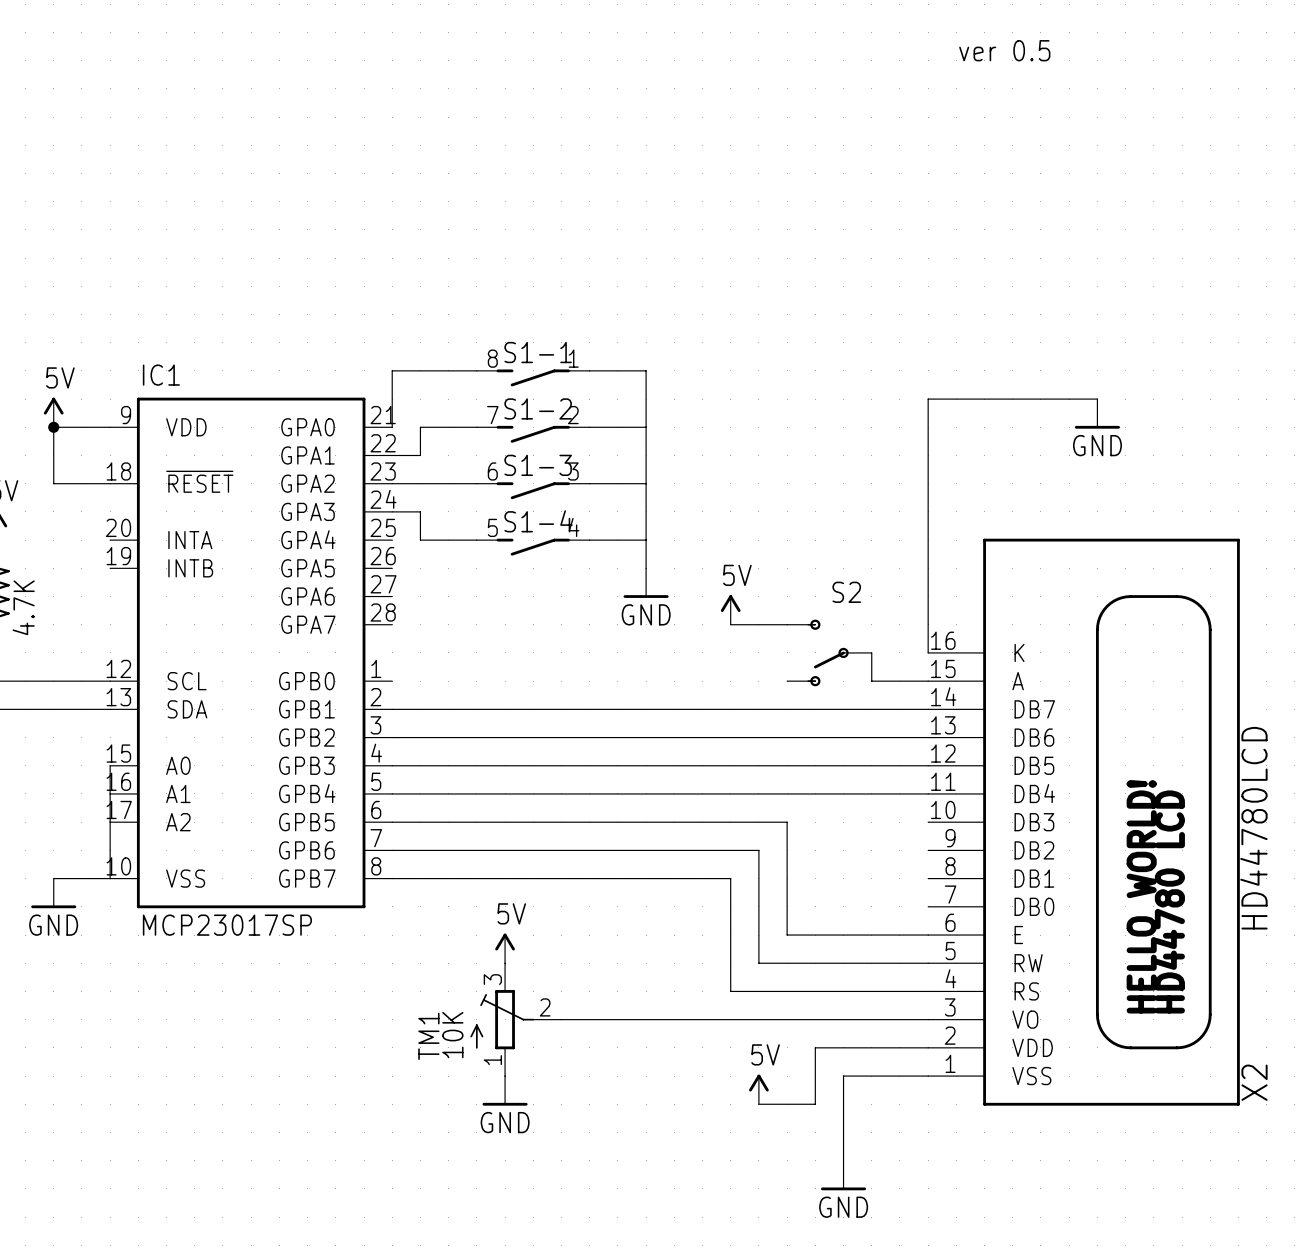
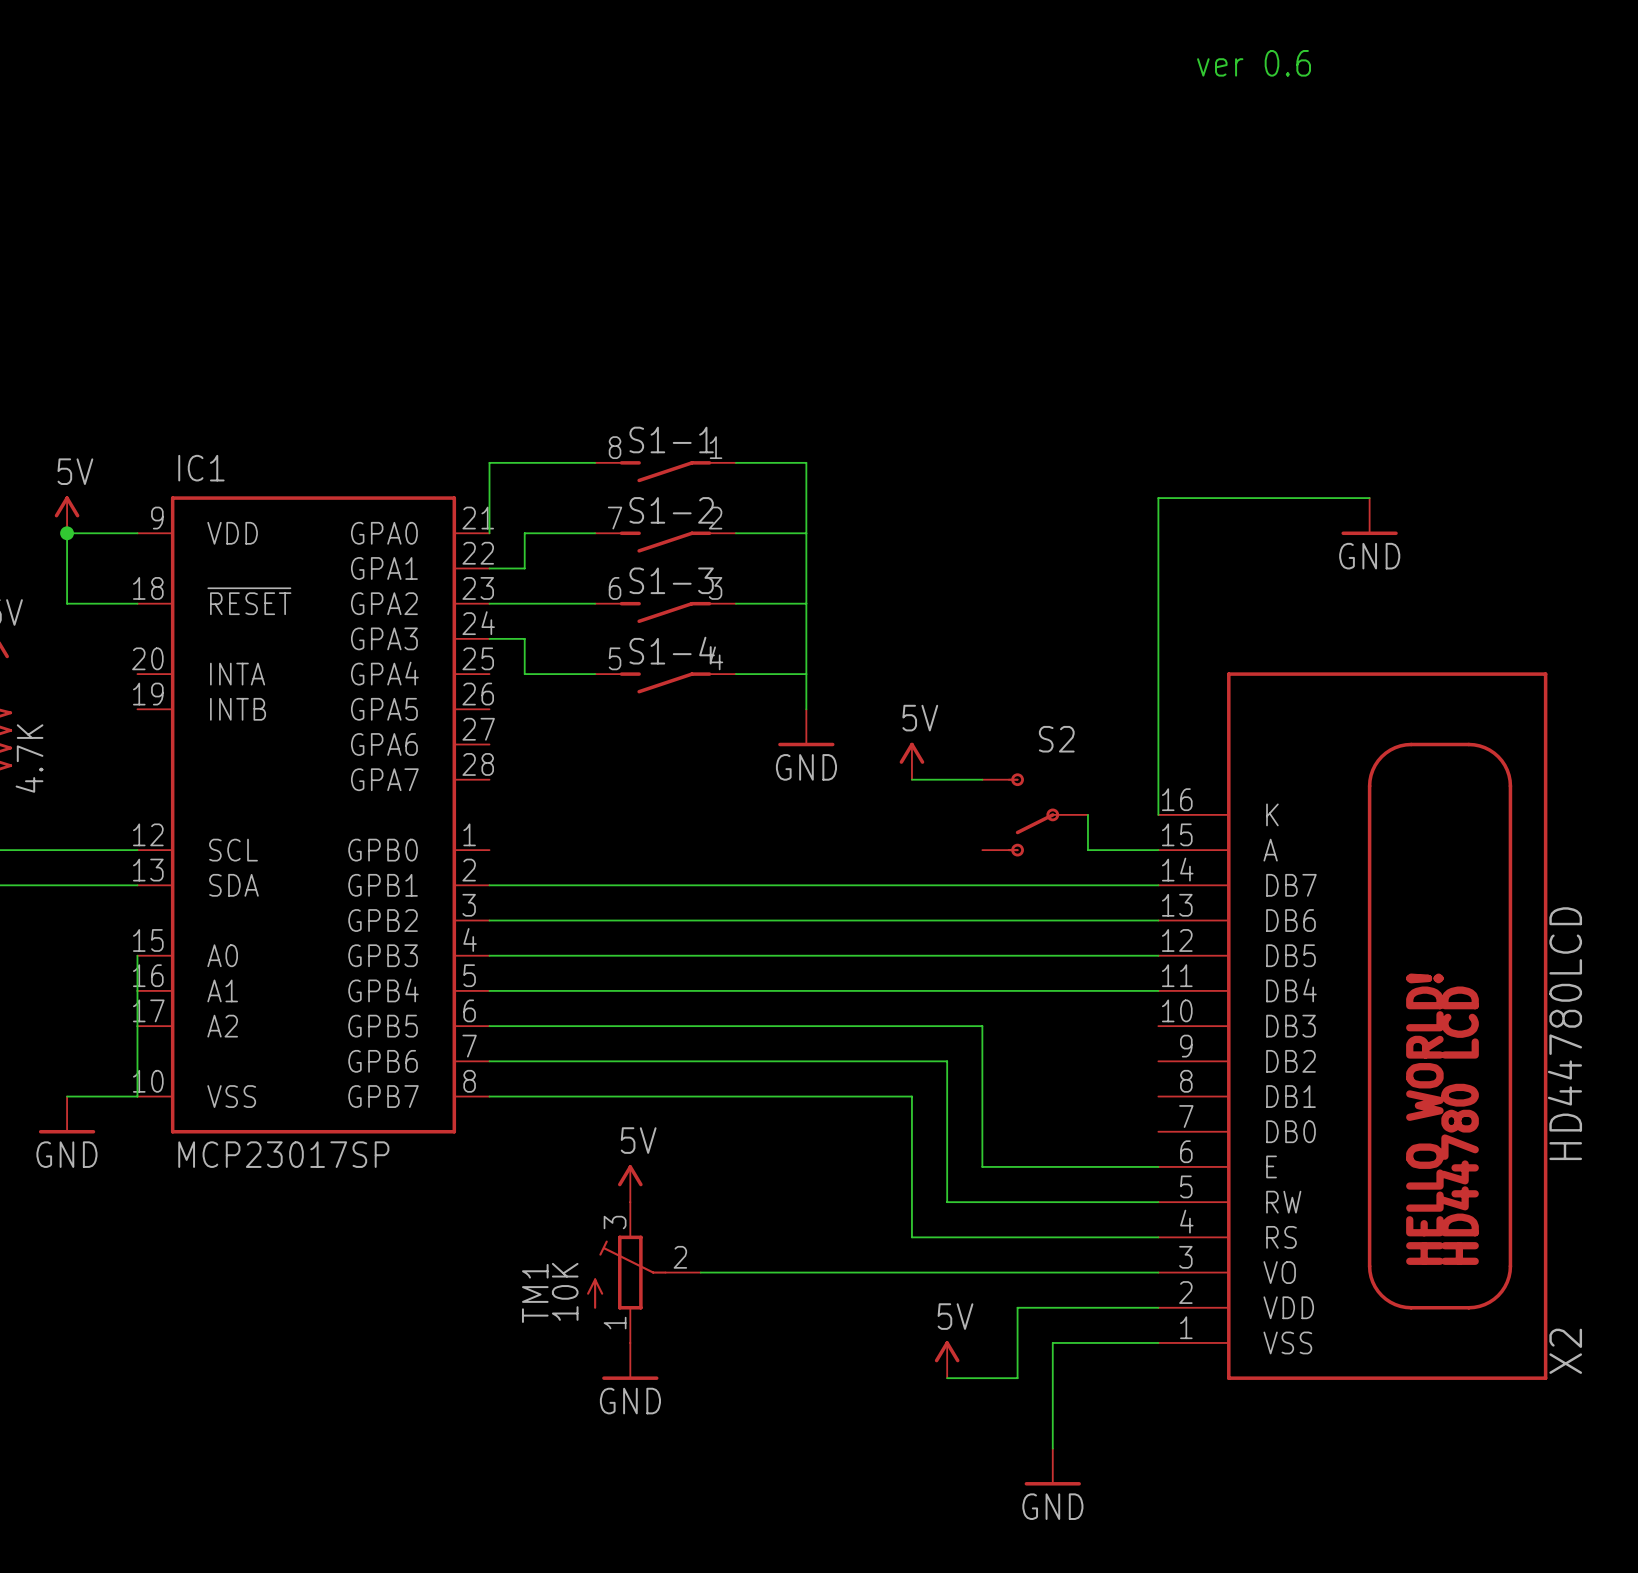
text: ver 0.5 (1004, 50) -> ver 0.6 (1254, 63)

